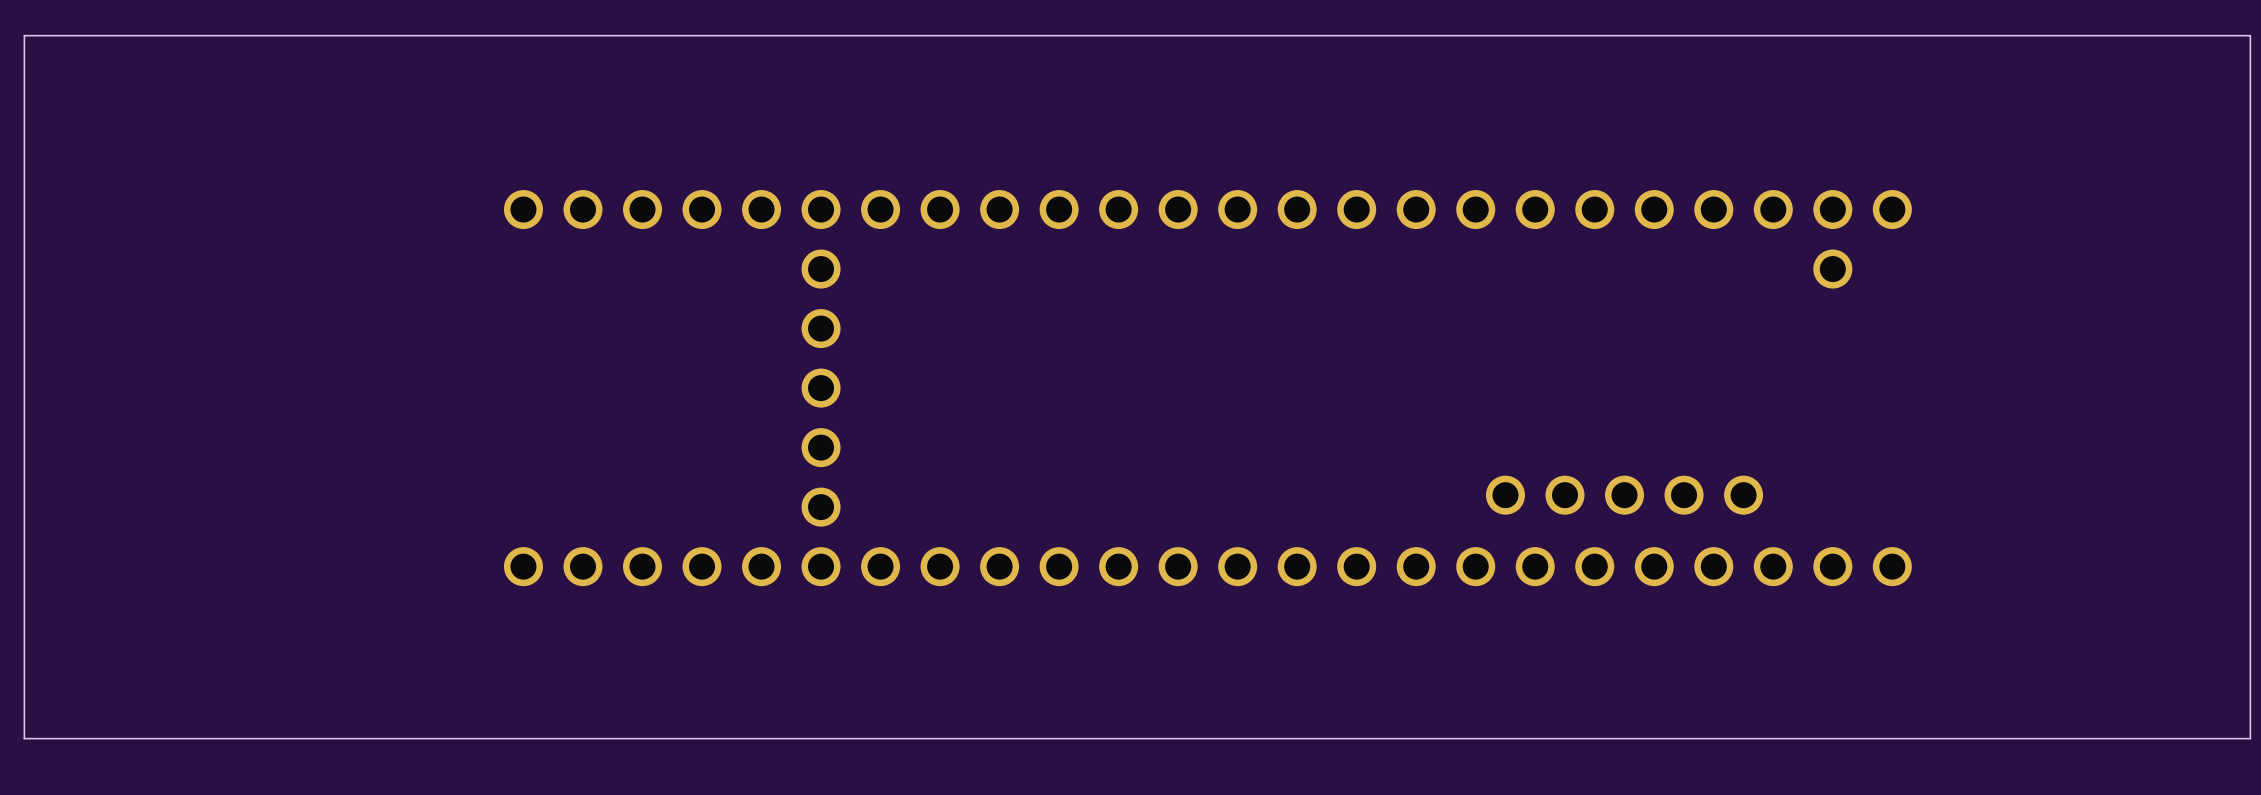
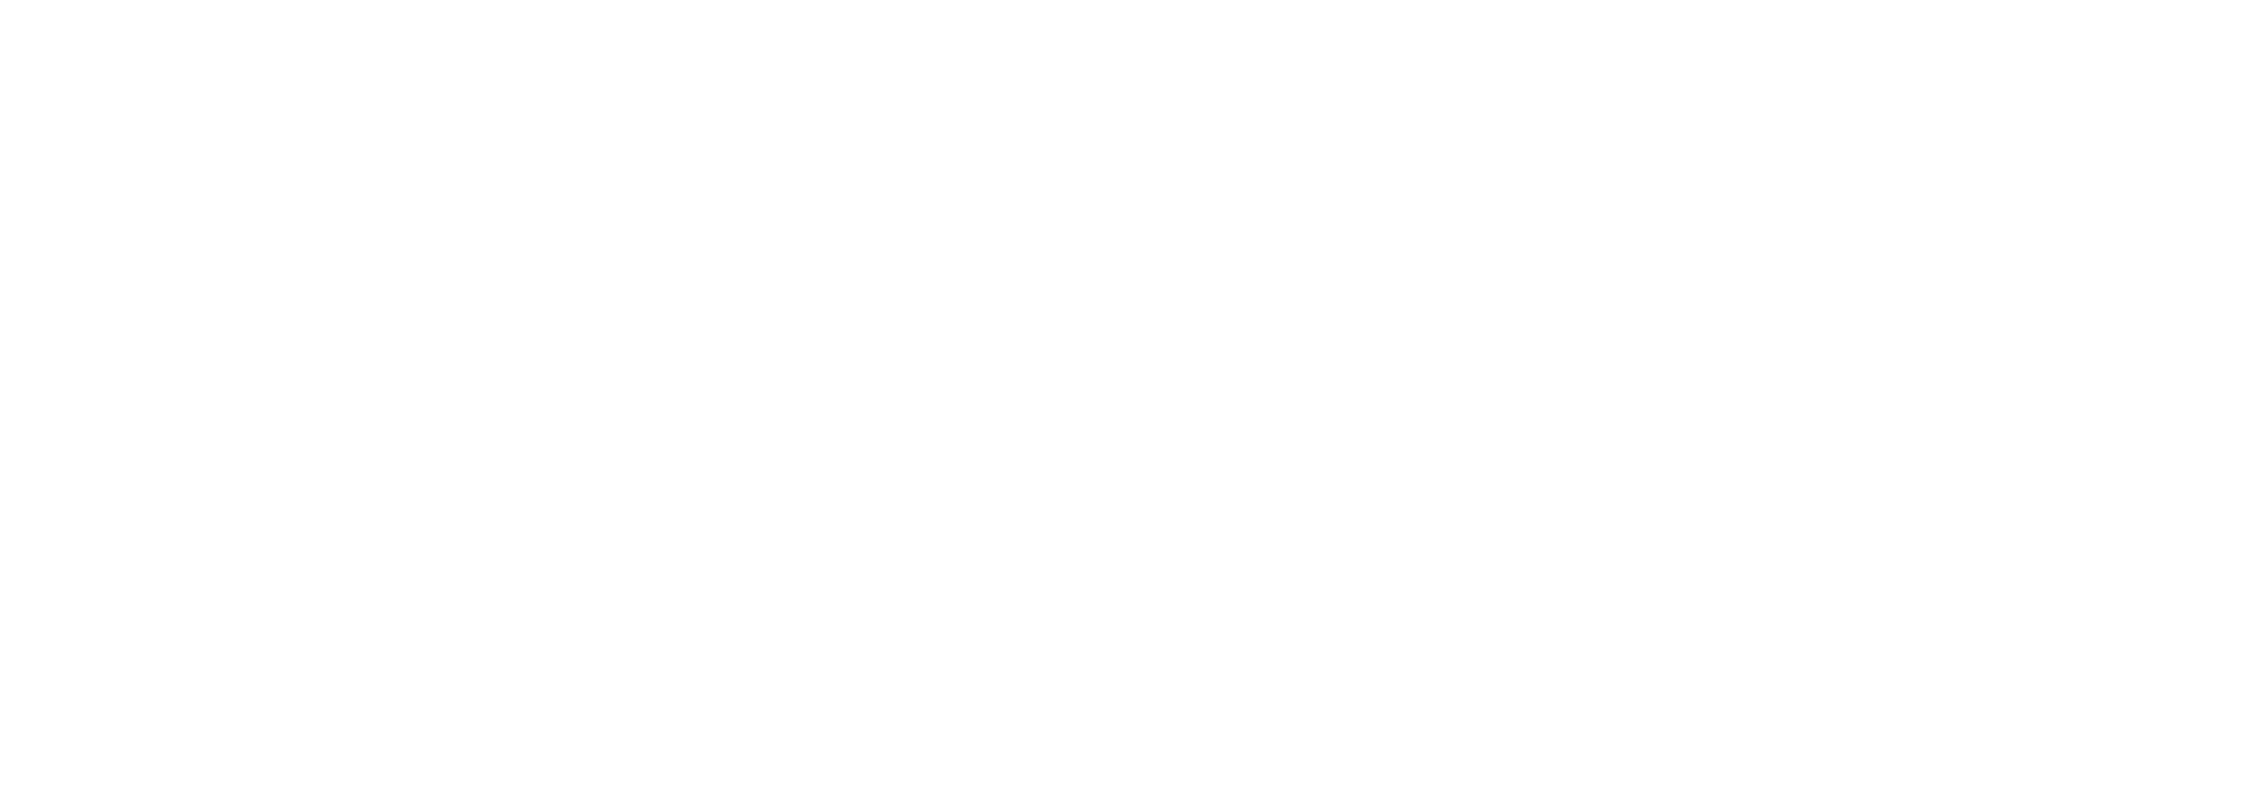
board edge: (2250, 35) (24, 35) (24, 738) (2250, 738) (2250, 35) -> none
part: (1207, 388) -> none

